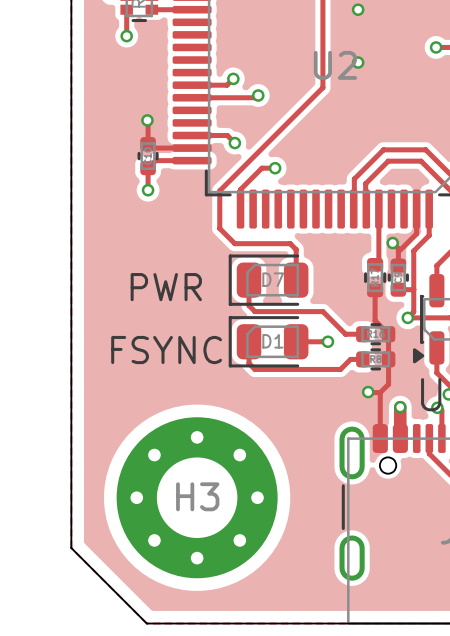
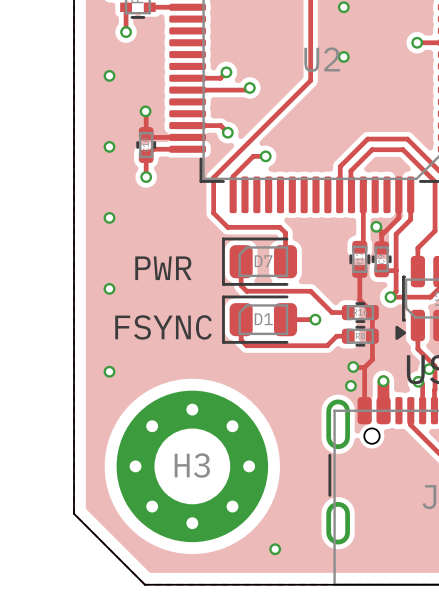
via: none -> (109, 75)
via: none -> (109, 146)
via: none -> (109, 217)
via: none -> (109, 288)
via: none -> (109, 371)
via: none -> (350, 385)
via: none -> (275, 549)

